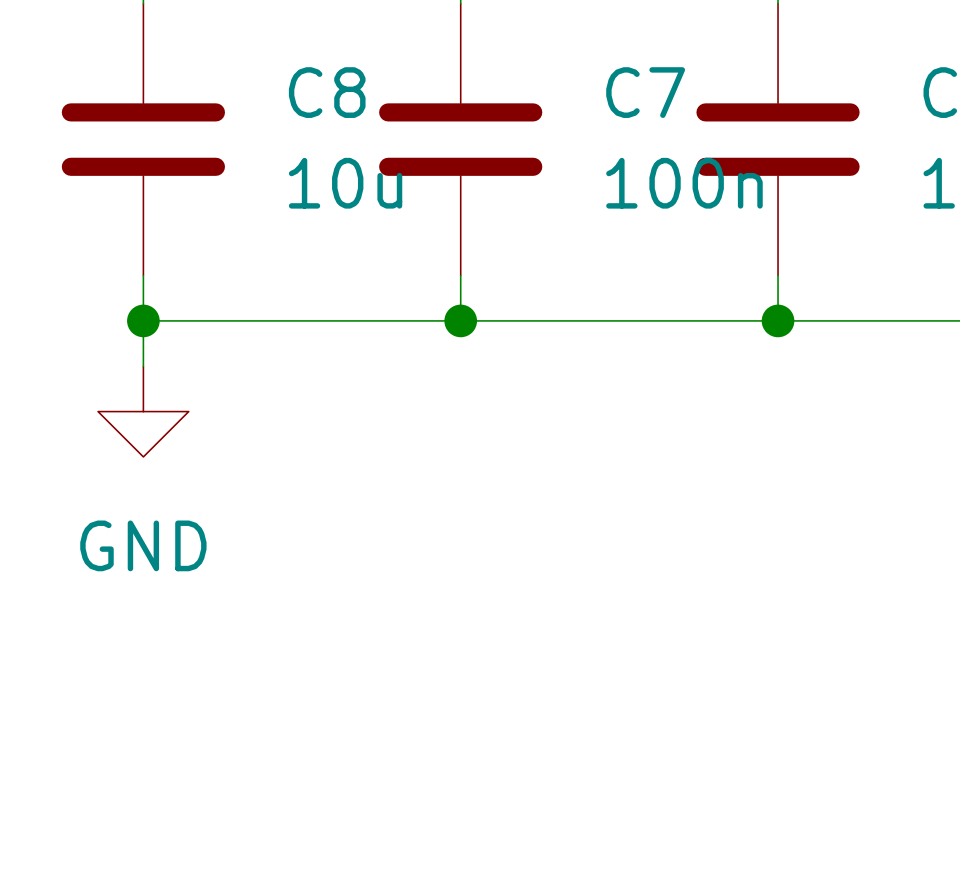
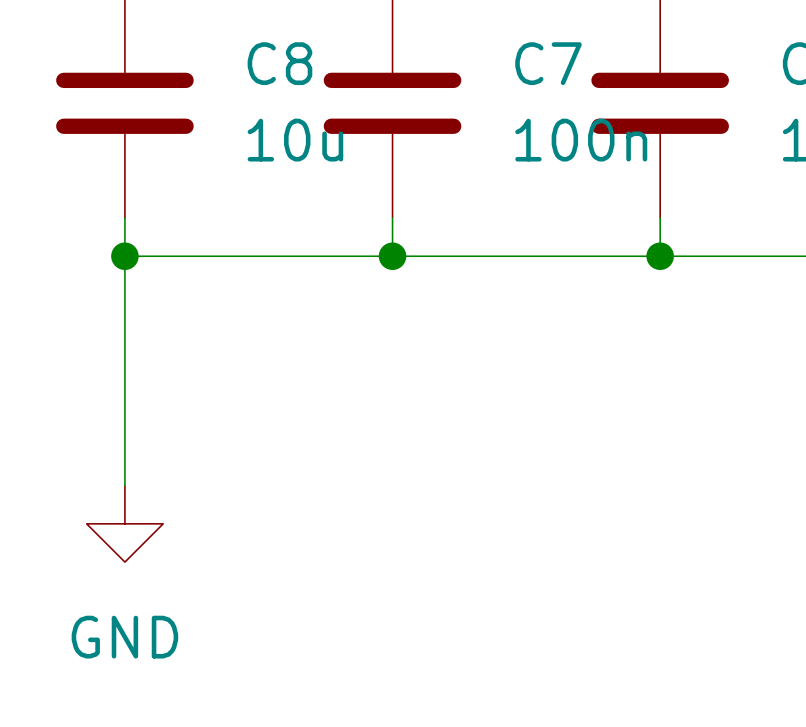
wire: none -> (124, 294) (124, 485)
power symbol position: GND (143, 411) -> GND (124, 523)

